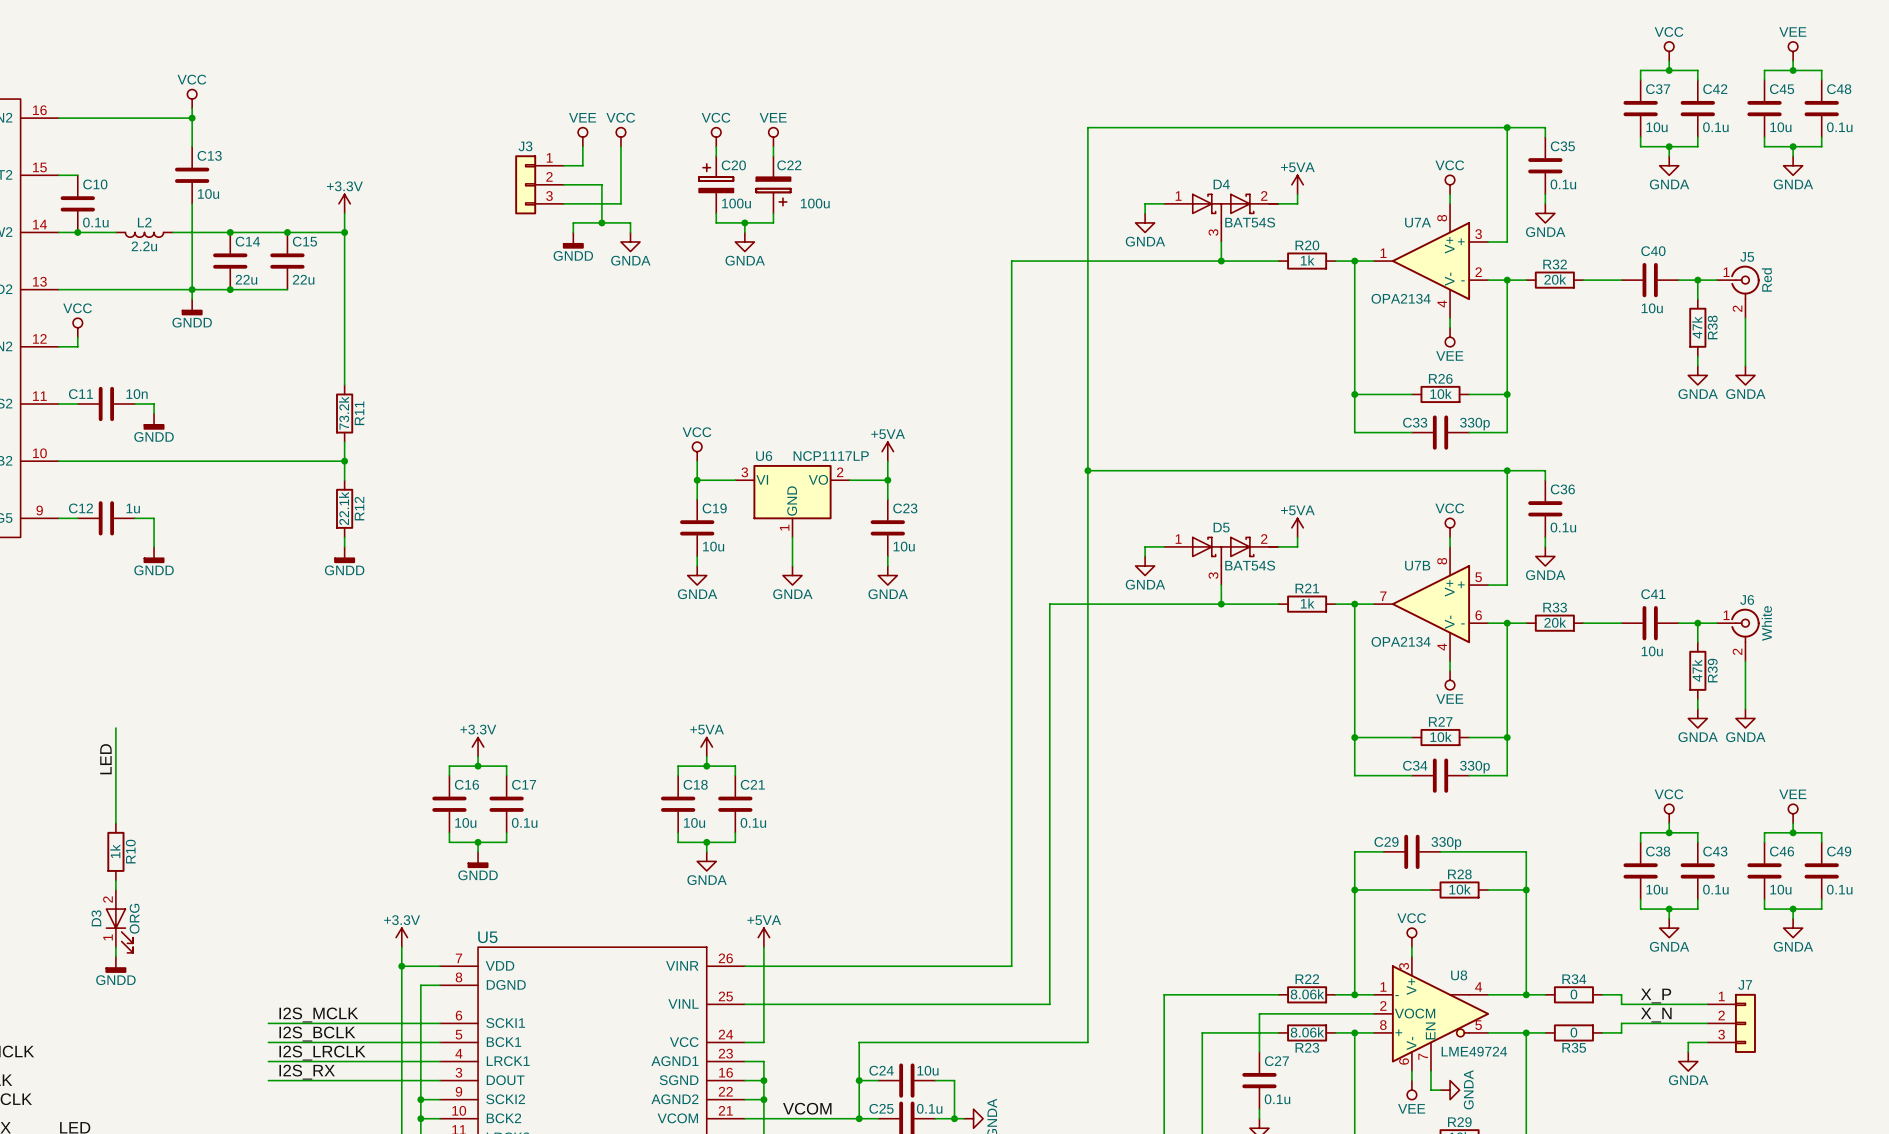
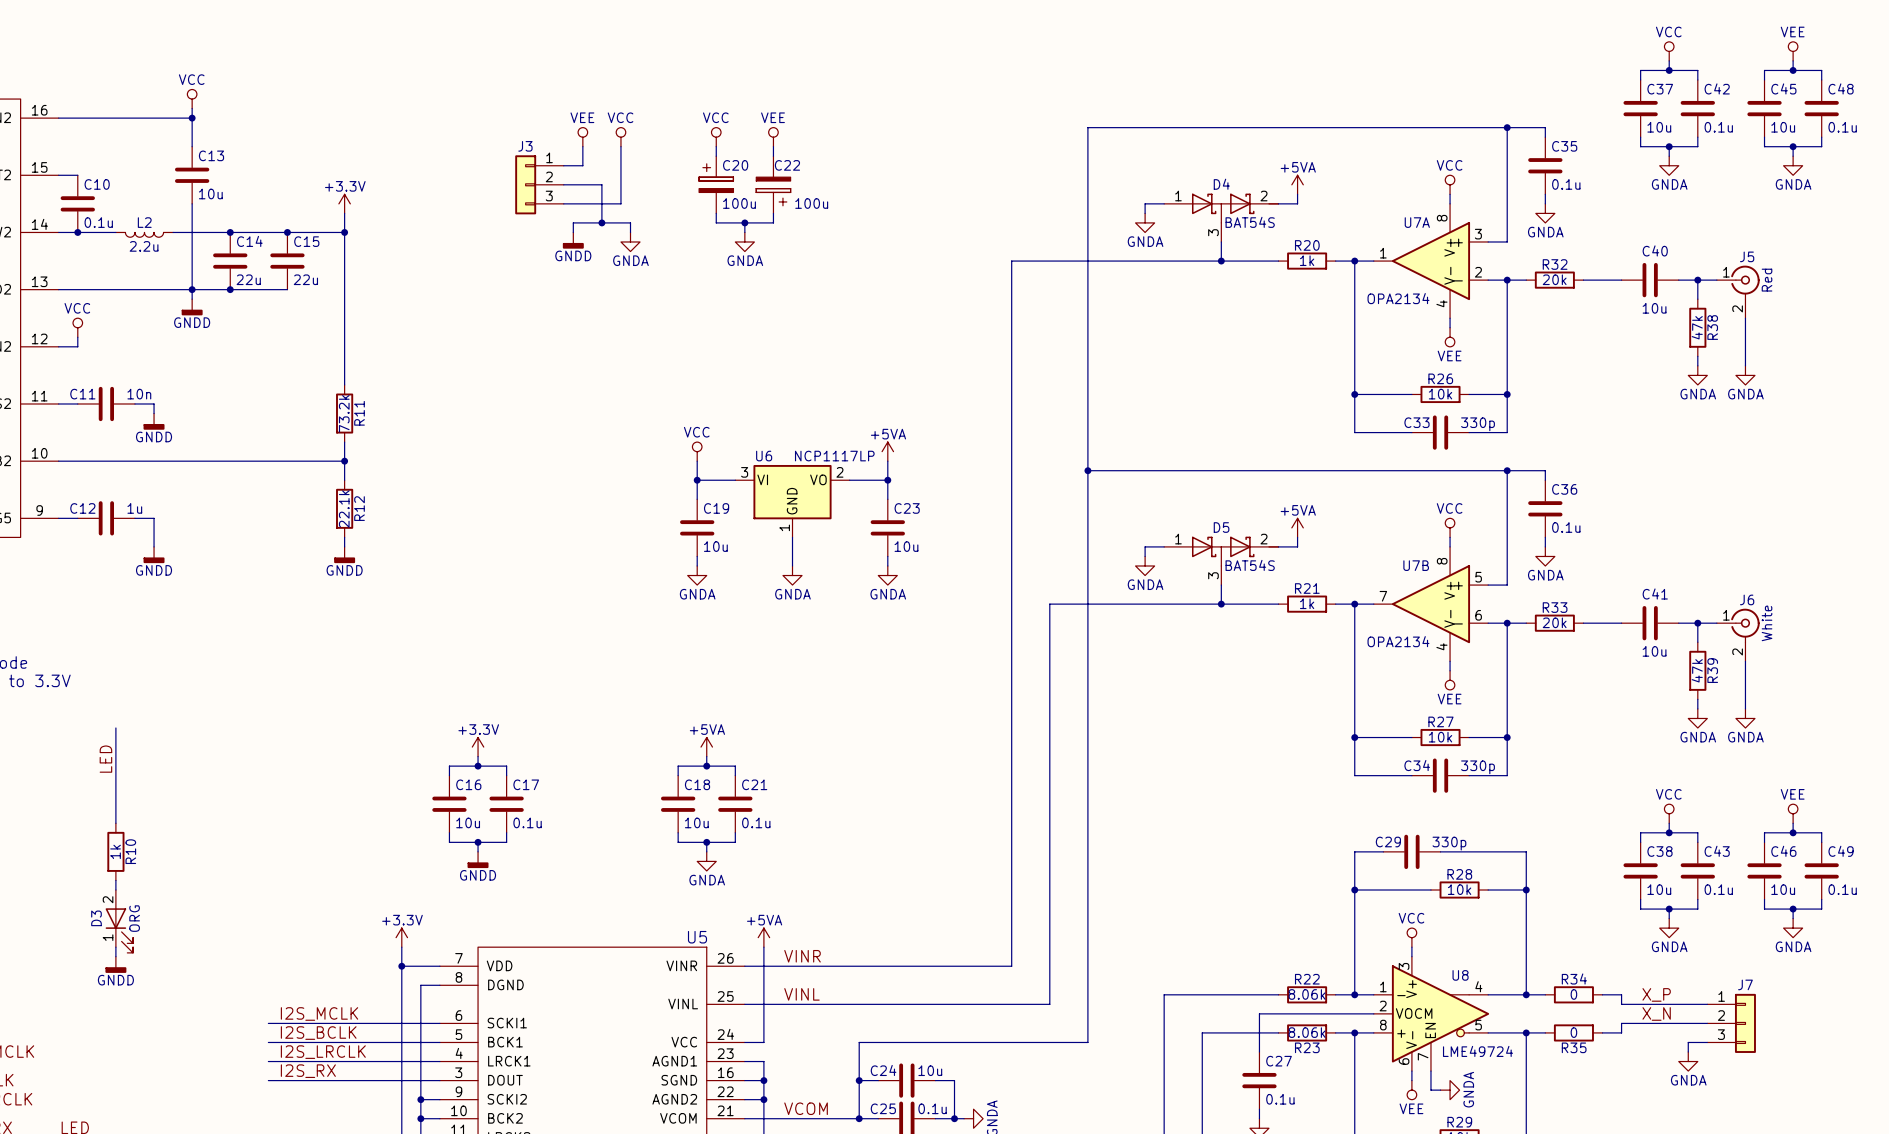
U5 name position: U5 (487, 937) -> U5 (697, 937)
label: none -> VINR (802, 956)
label: none -> VINL (801, 994)

